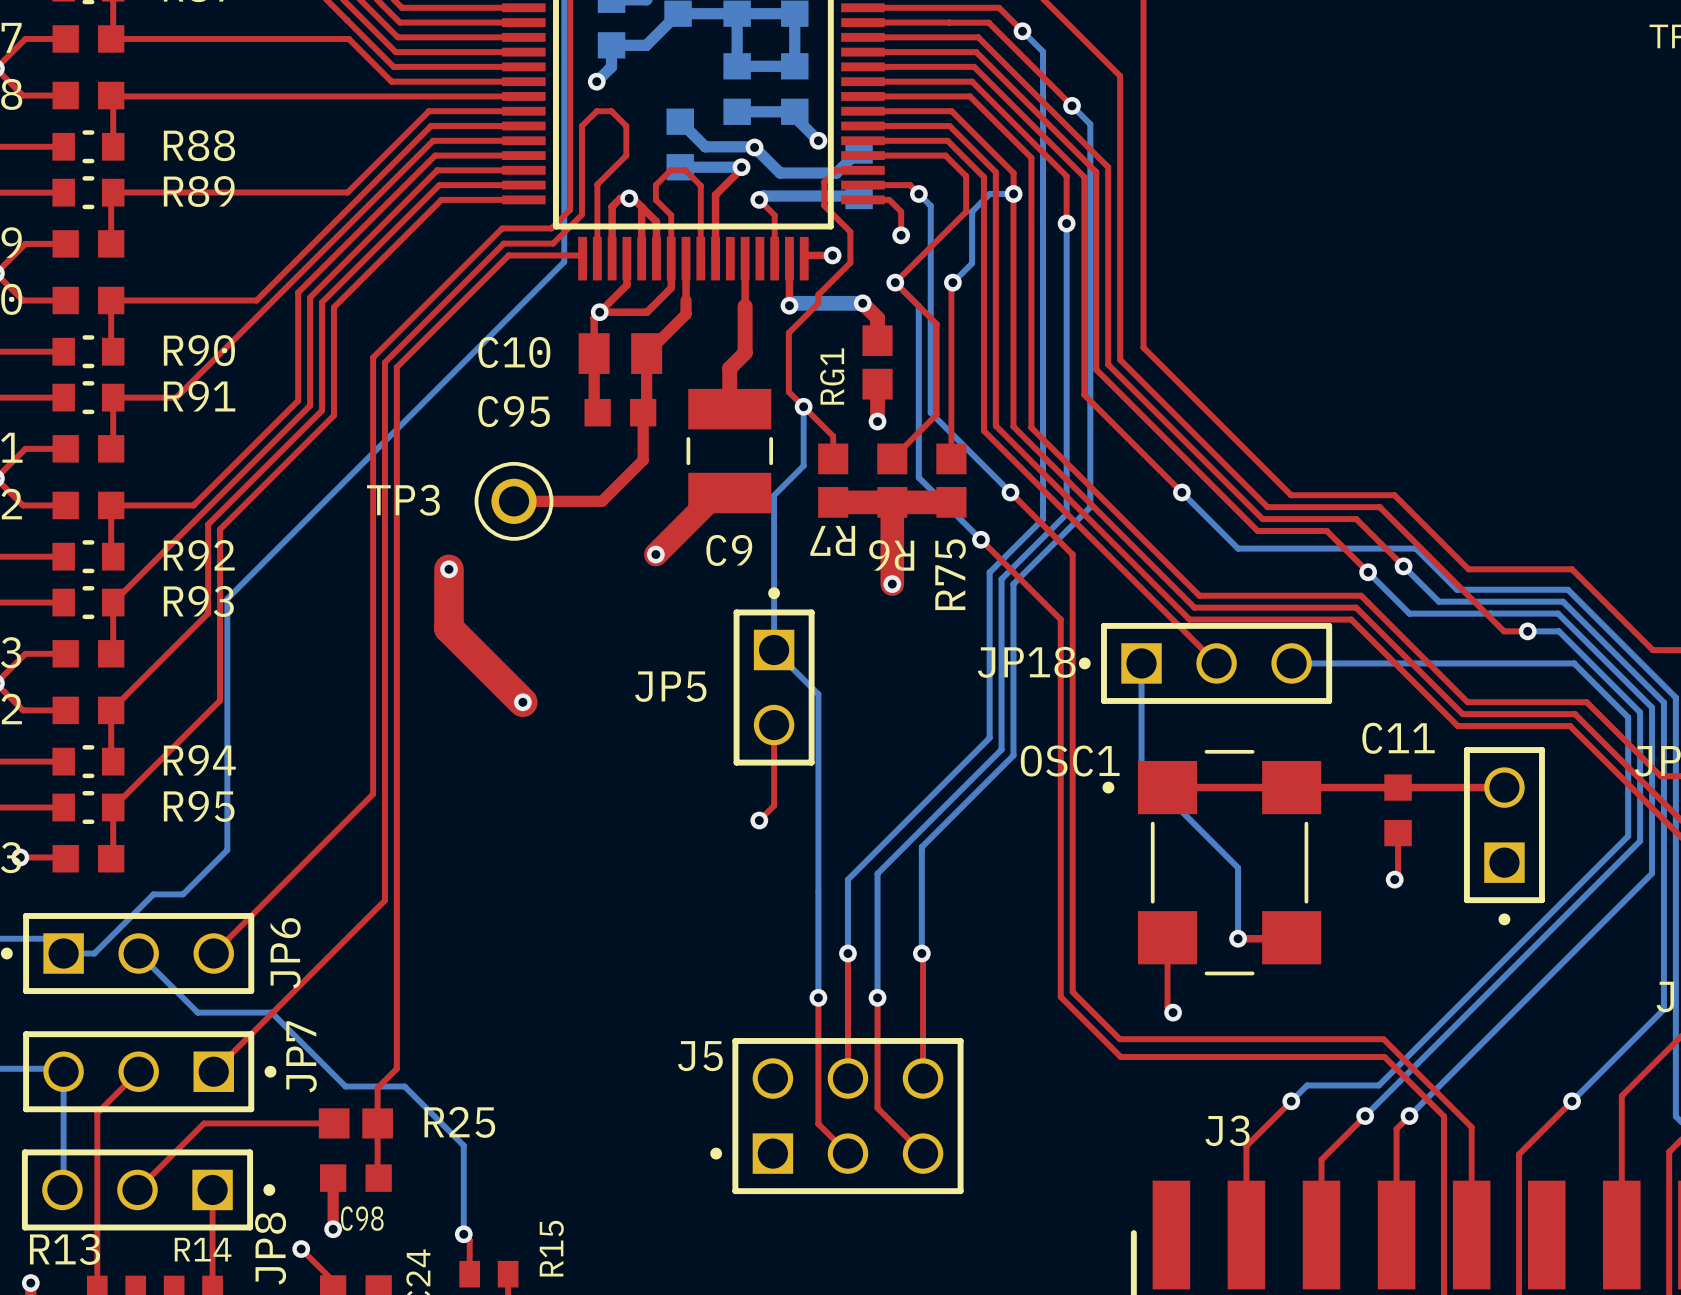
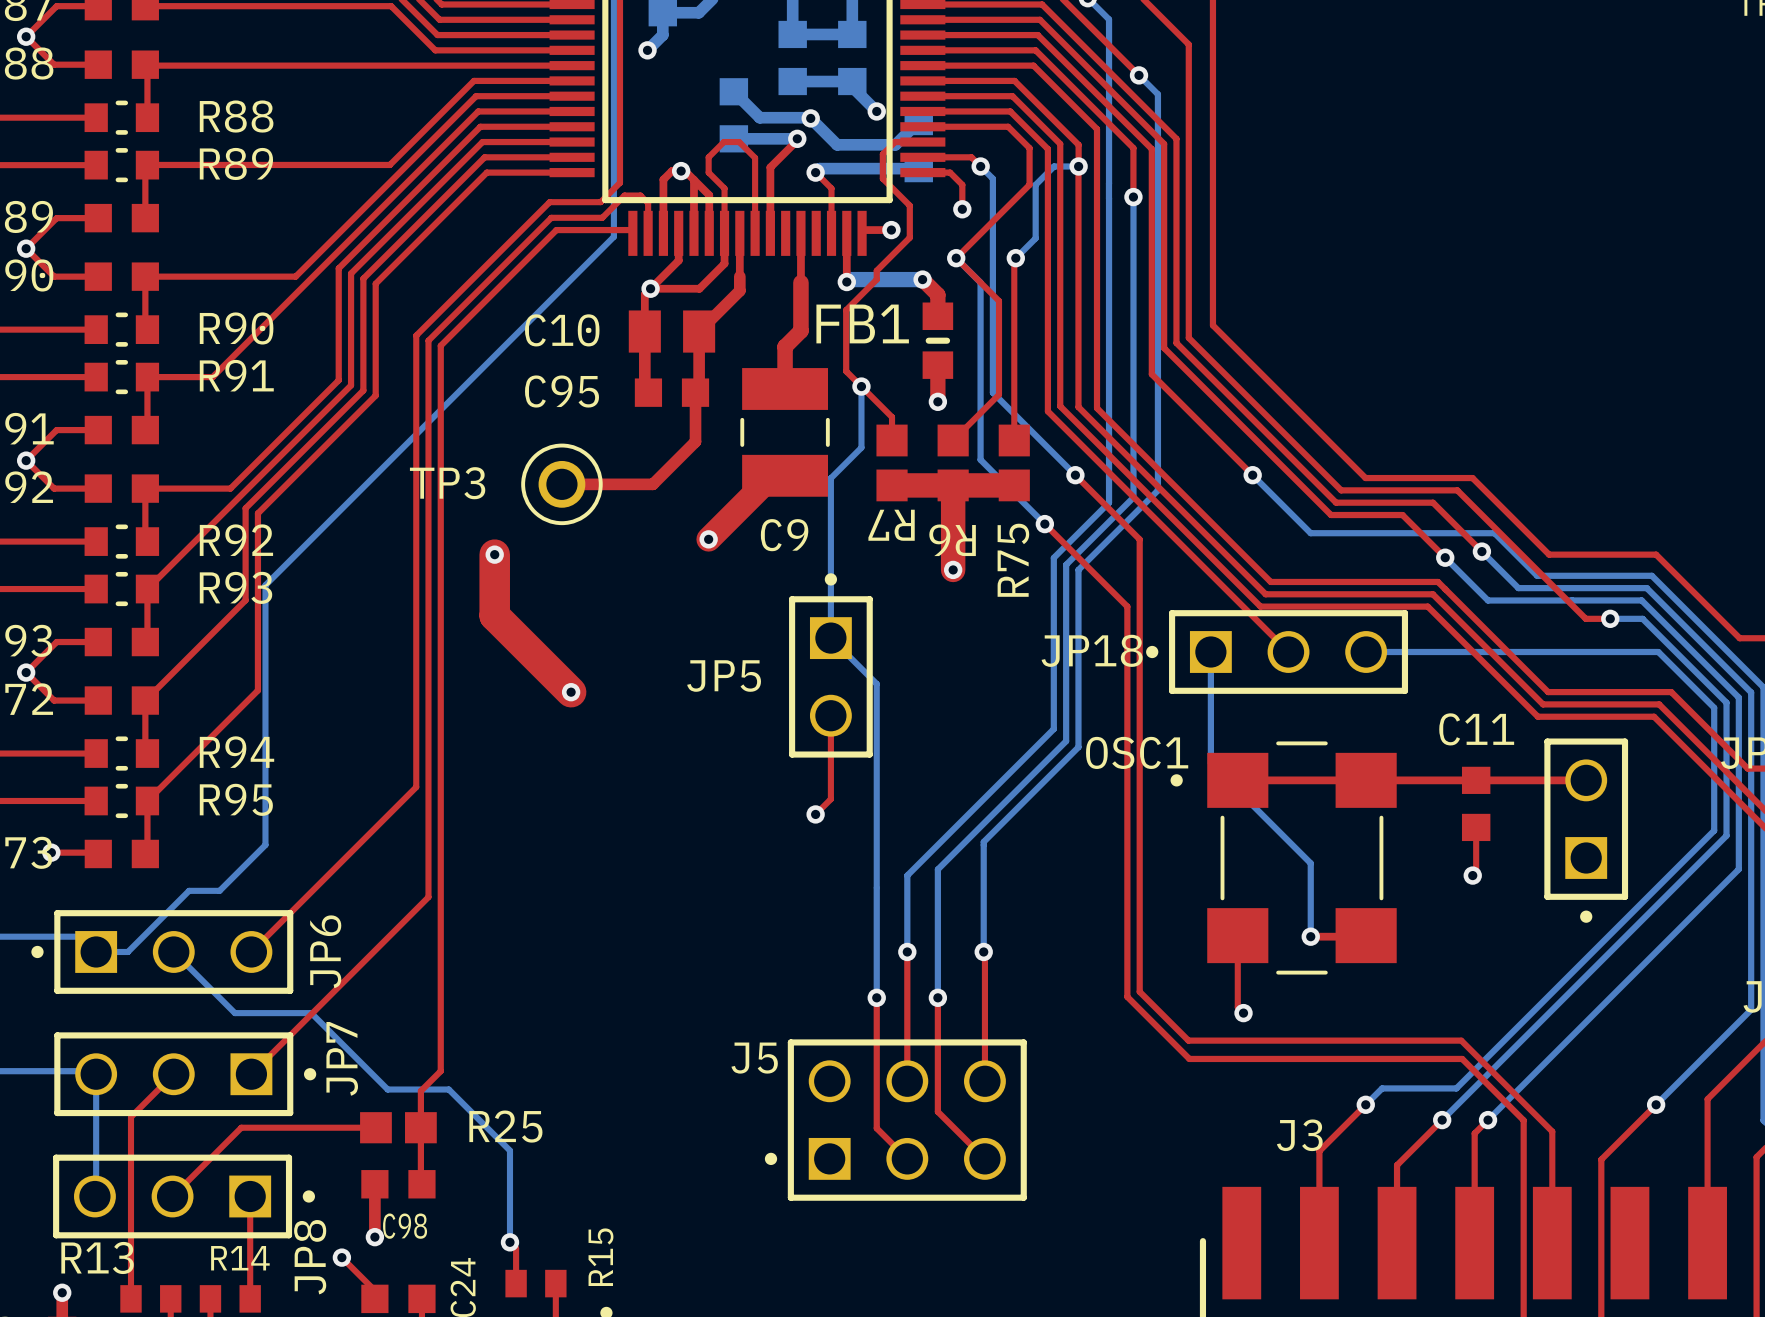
top track: (574, 222) (581, 214) (581, 126) (596, 111) (611, 111) (626, 126) (626, 155) (597, 184) (597, 229) -> (624, 195) (640, 195) (648, 203)
RG1: (877, 362) -> none
FB1: none -> (937, 340)

